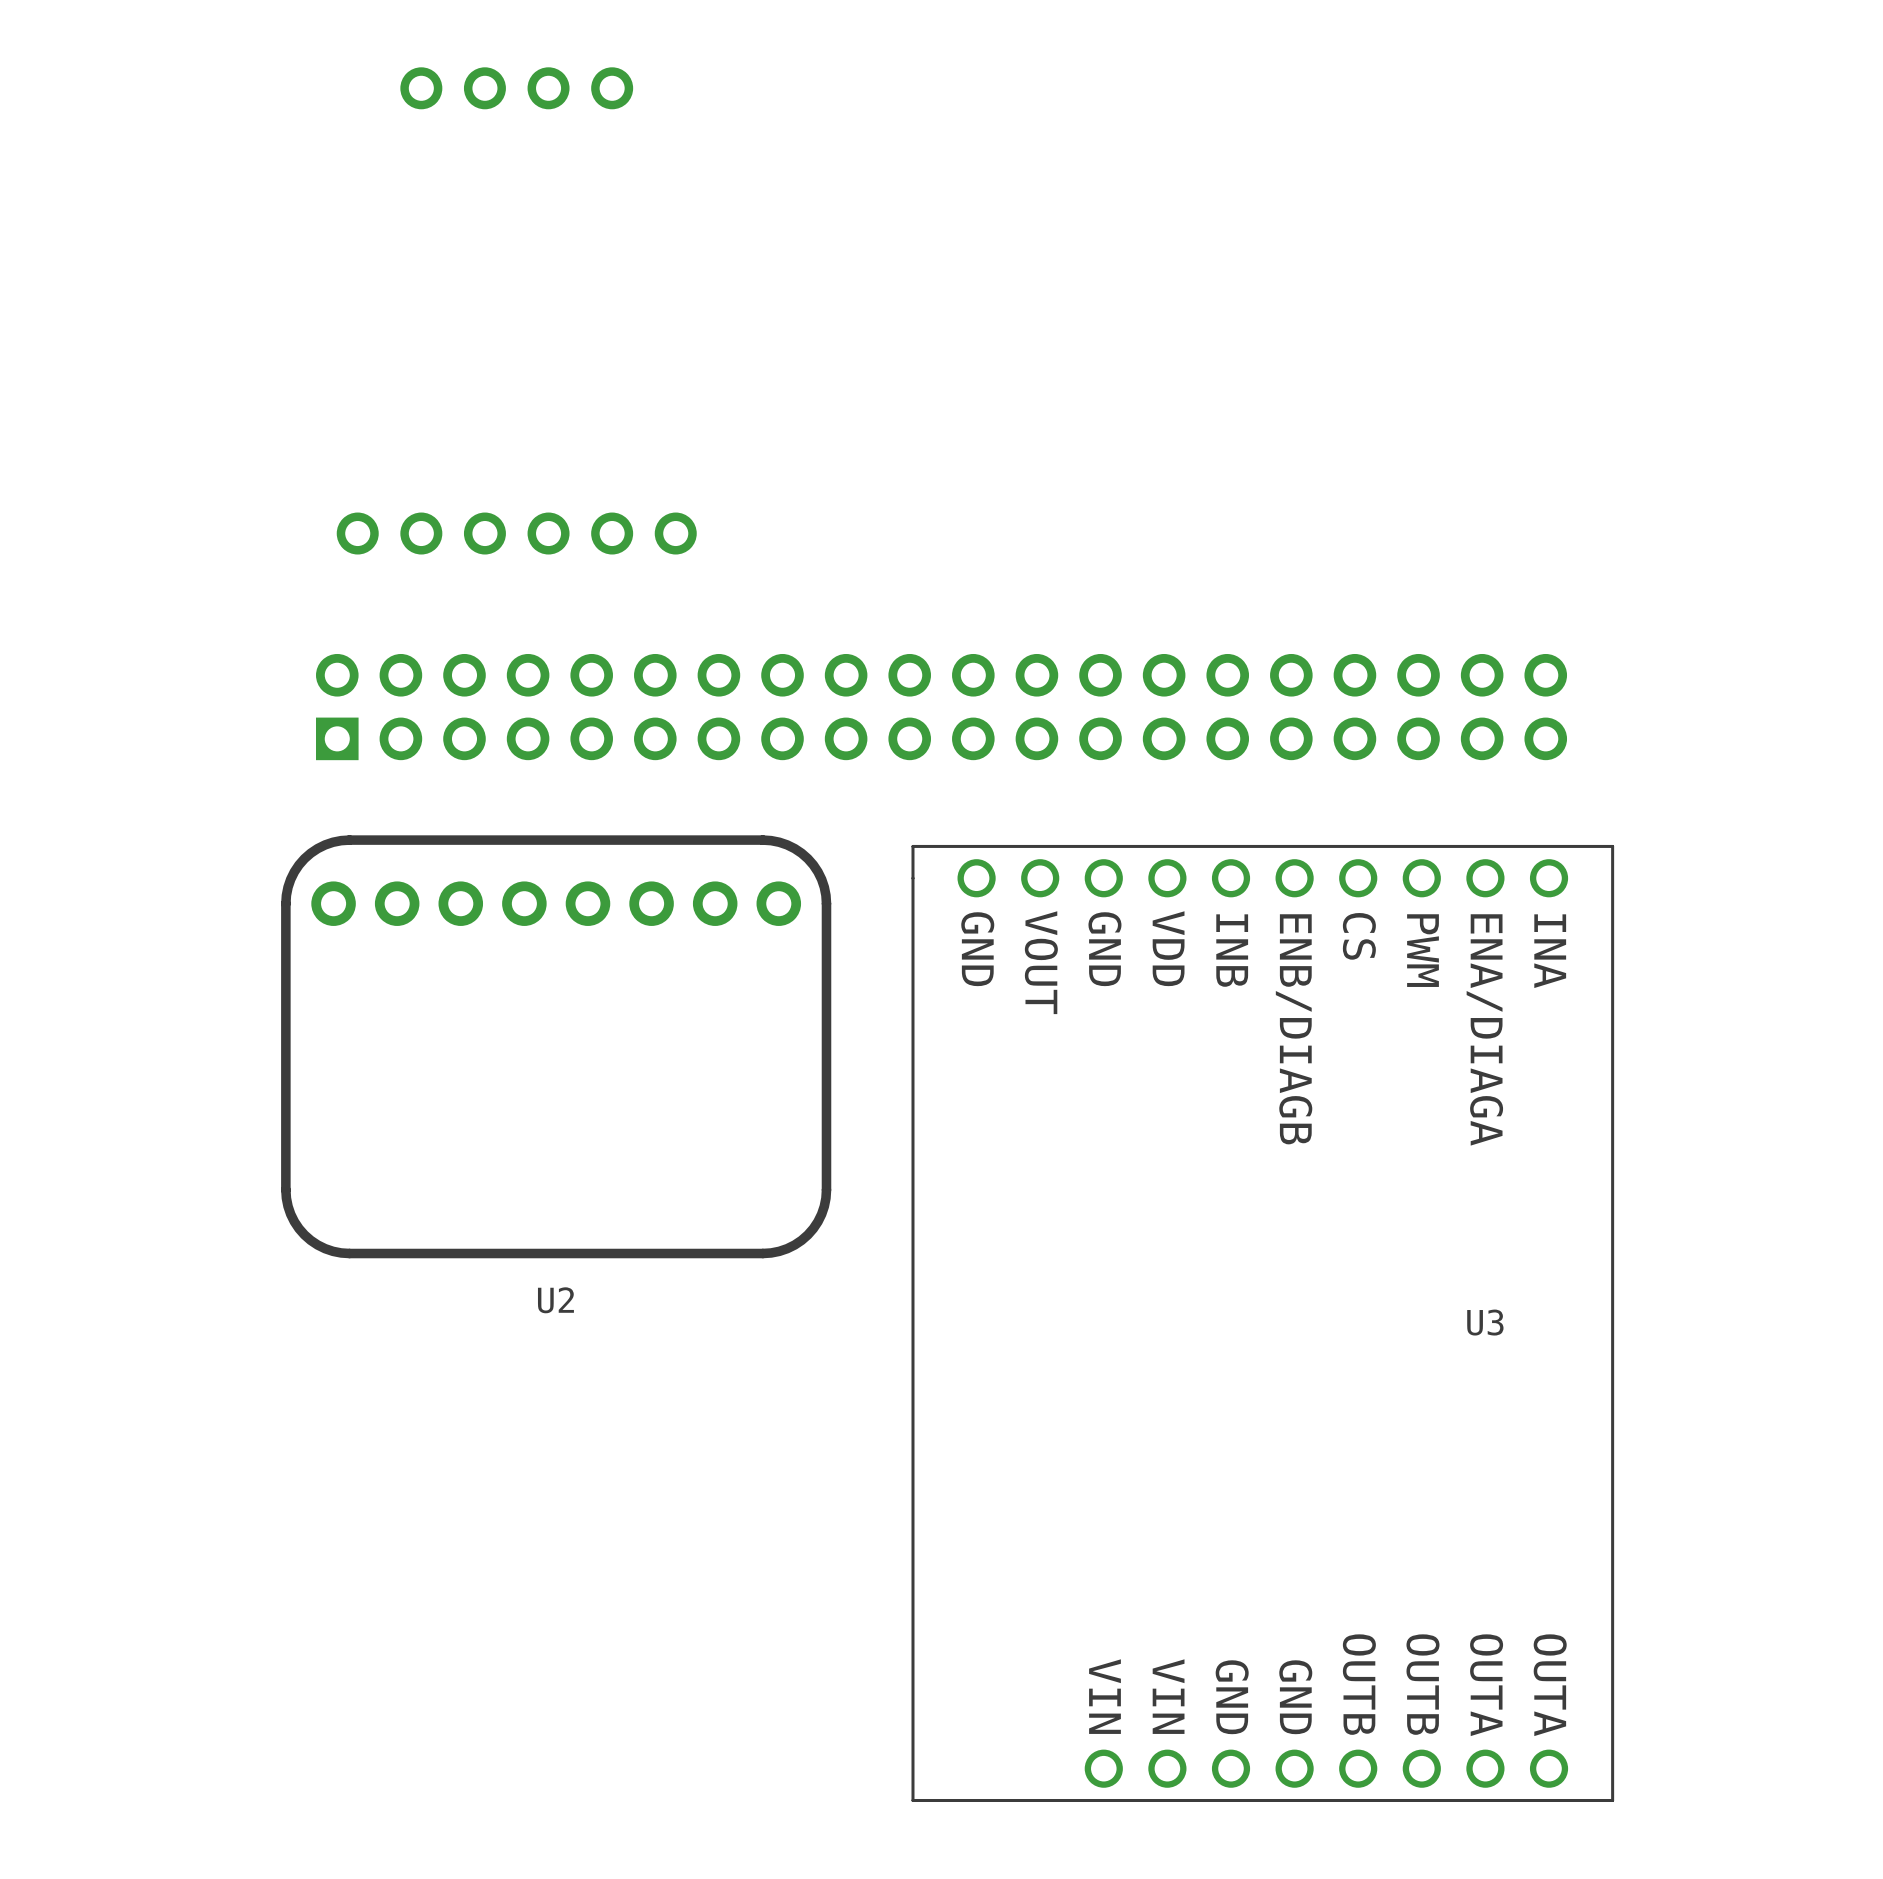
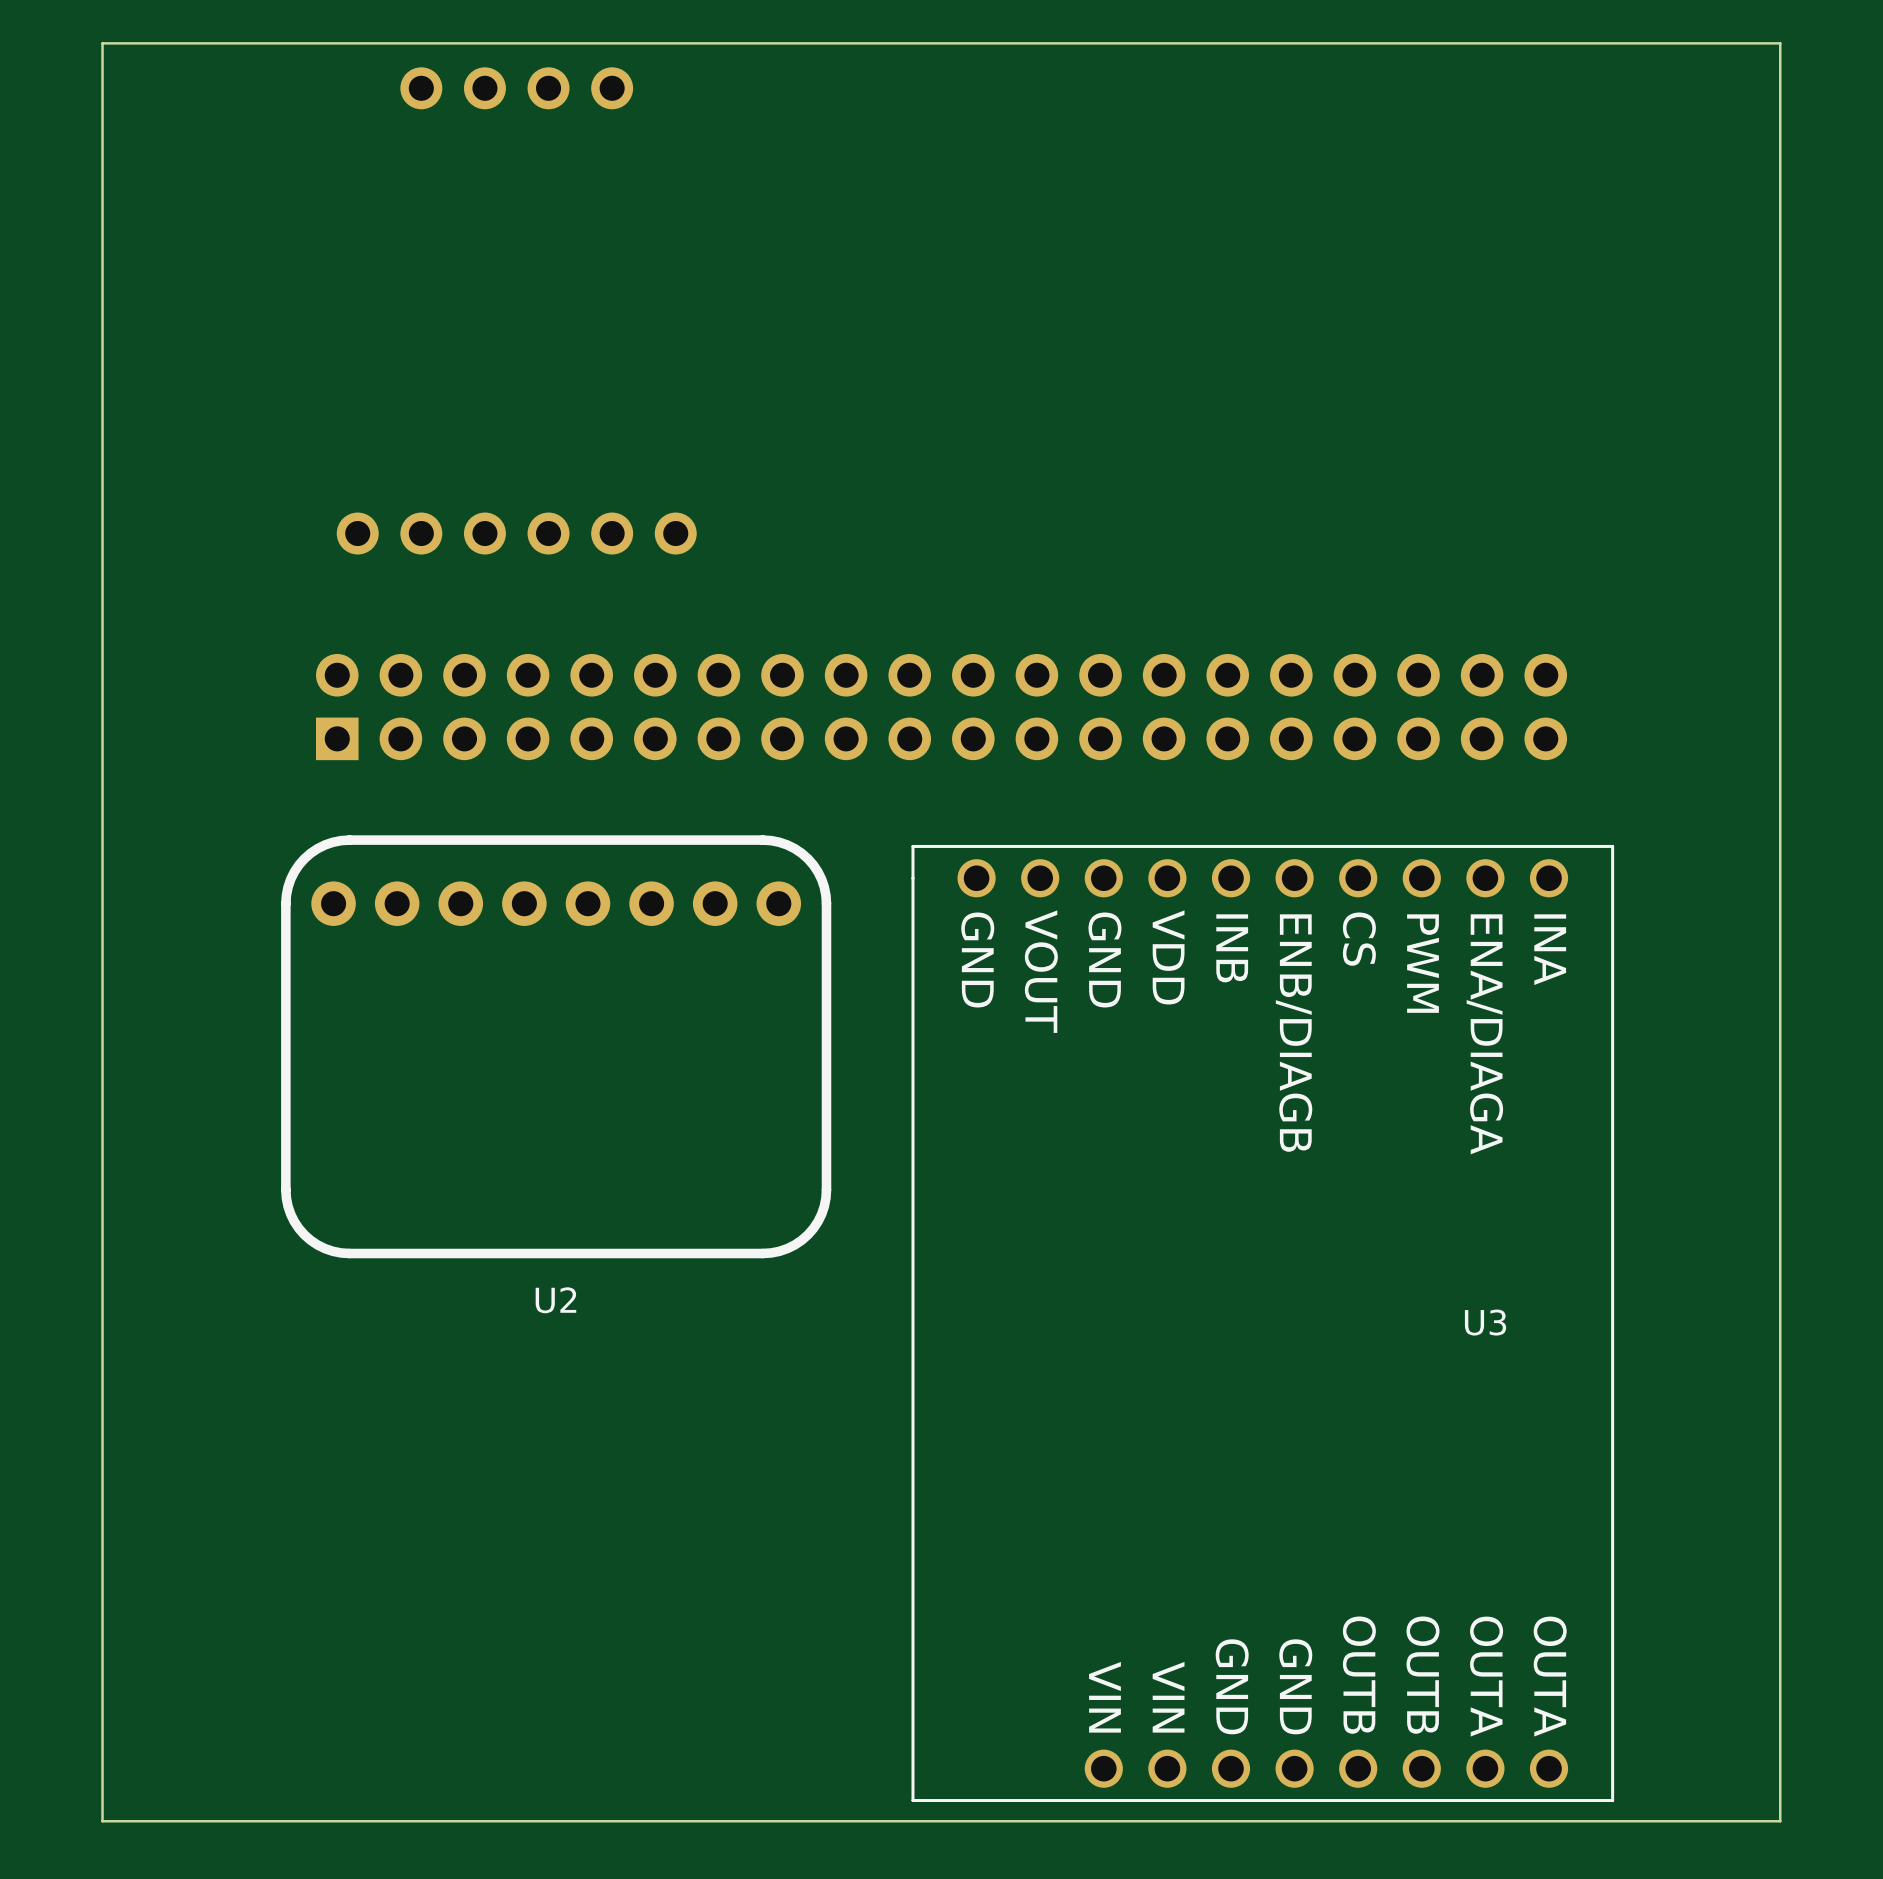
board edge: none -> (1780, 43) (1780, 1821) (102, 1821) (102, 43) (1780, 43)

